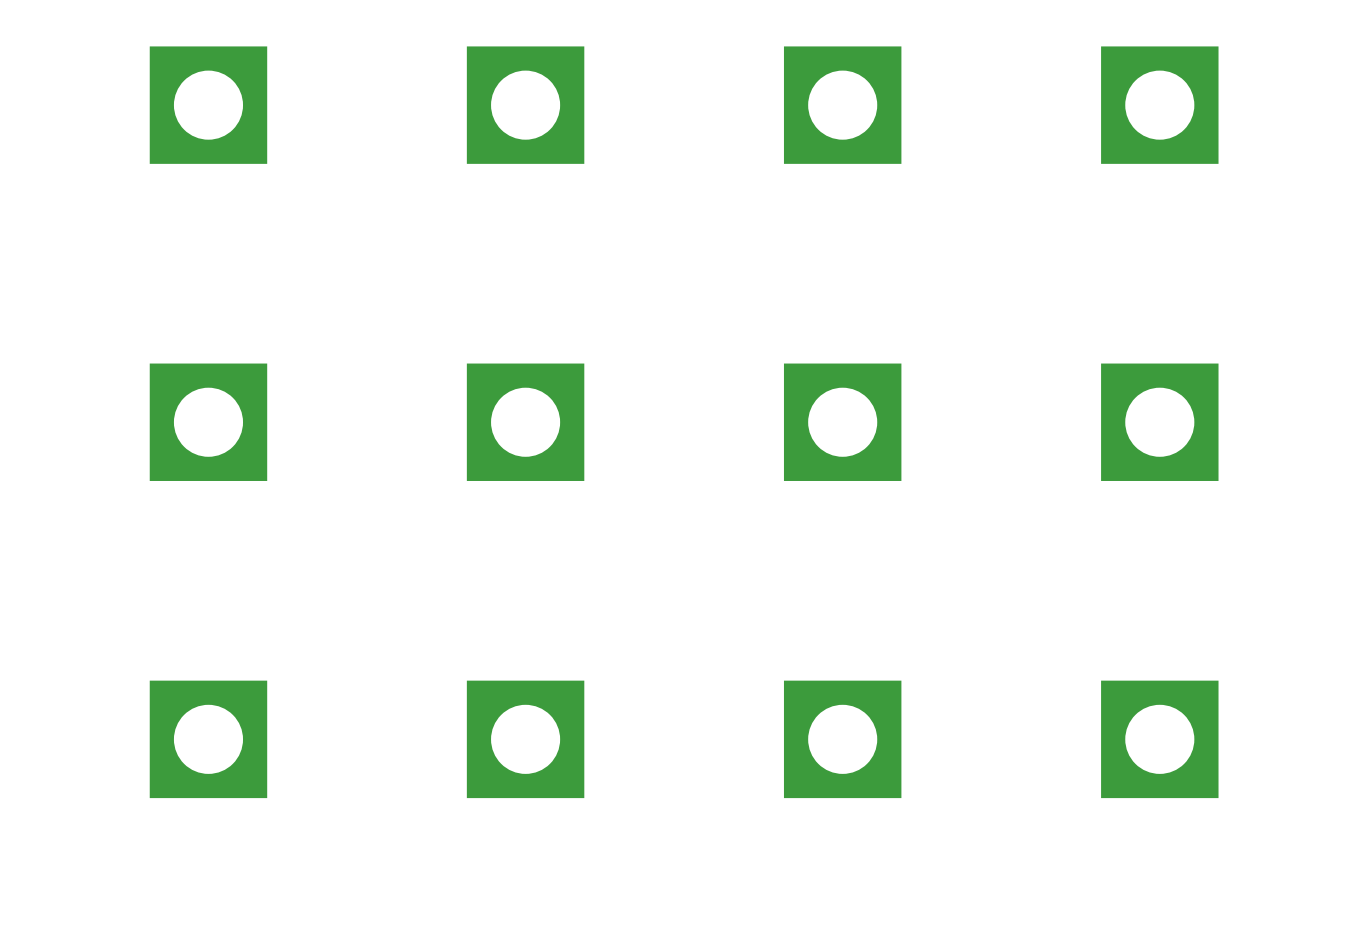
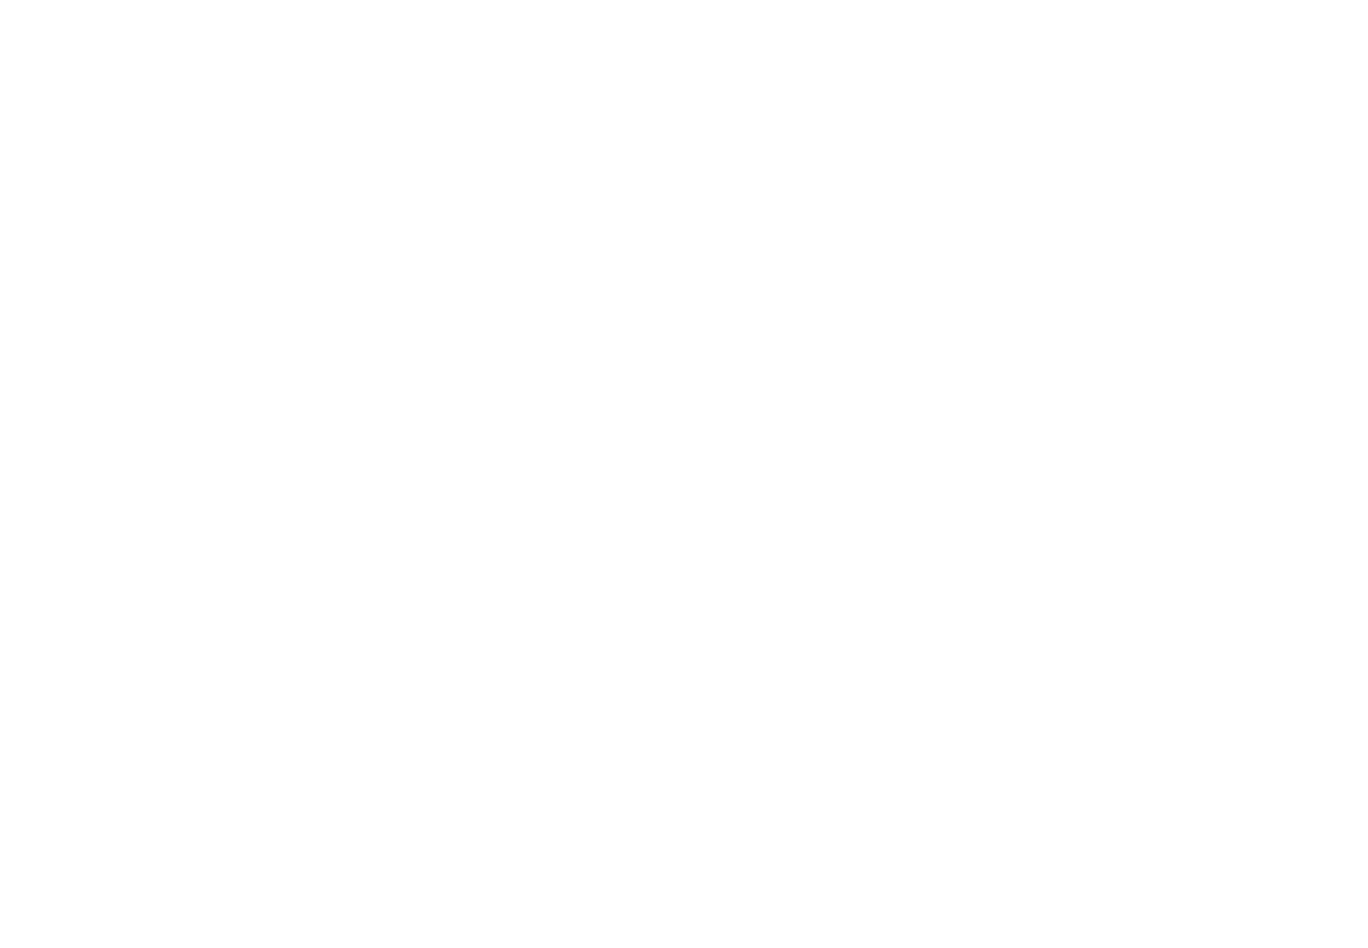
part: (208, 105) -> none
part: (525, 105) -> none
part: (842, 105) -> none
part: (1159, 105) -> none
part: (208, 422) -> none
part: (525, 422) -> none
part: (842, 422) -> none
part: (1159, 422) -> none
part: (208, 739) -> none
part: (525, 739) -> none
part: (842, 739) -> none
part: (1159, 739) -> none

